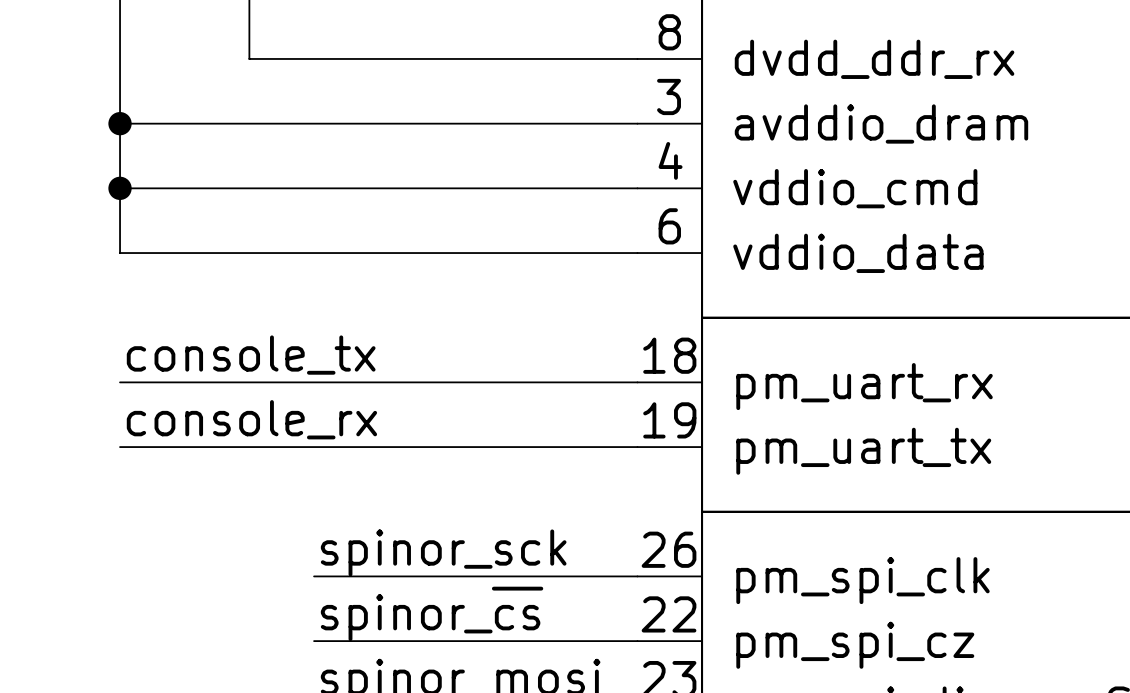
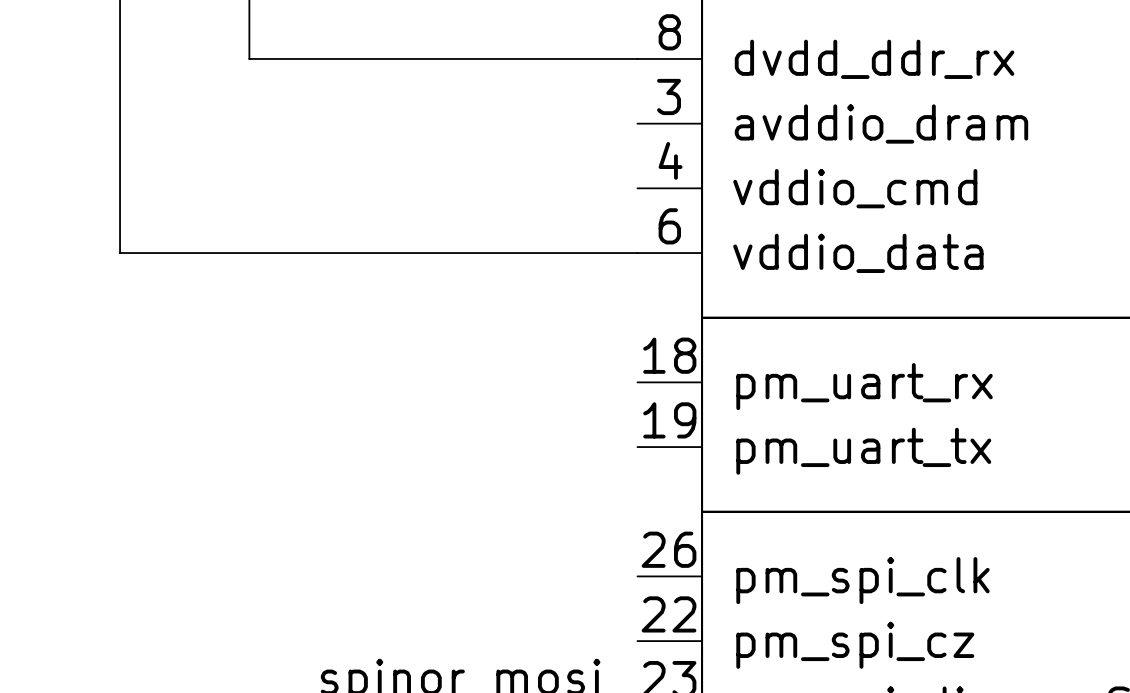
wire: (120, 123) (637, 123) -> none
junction: (120, 123) -> none
wire: (120, 188) (637, 188) -> none
junction: (120, 188) -> none
label: console_tx (251, 355) -> none
wire: (120, 382) (637, 382) -> none
label: console_rx (251, 419) -> none
wire: (120, 447) (637, 447) -> none
label: spinor_sck (443, 552) -> none
wire: (314, 576) (637, 576) -> none
label: spinor_~{cs} (432, 613) -> none
wire: (314, 641) (637, 641) -> none

